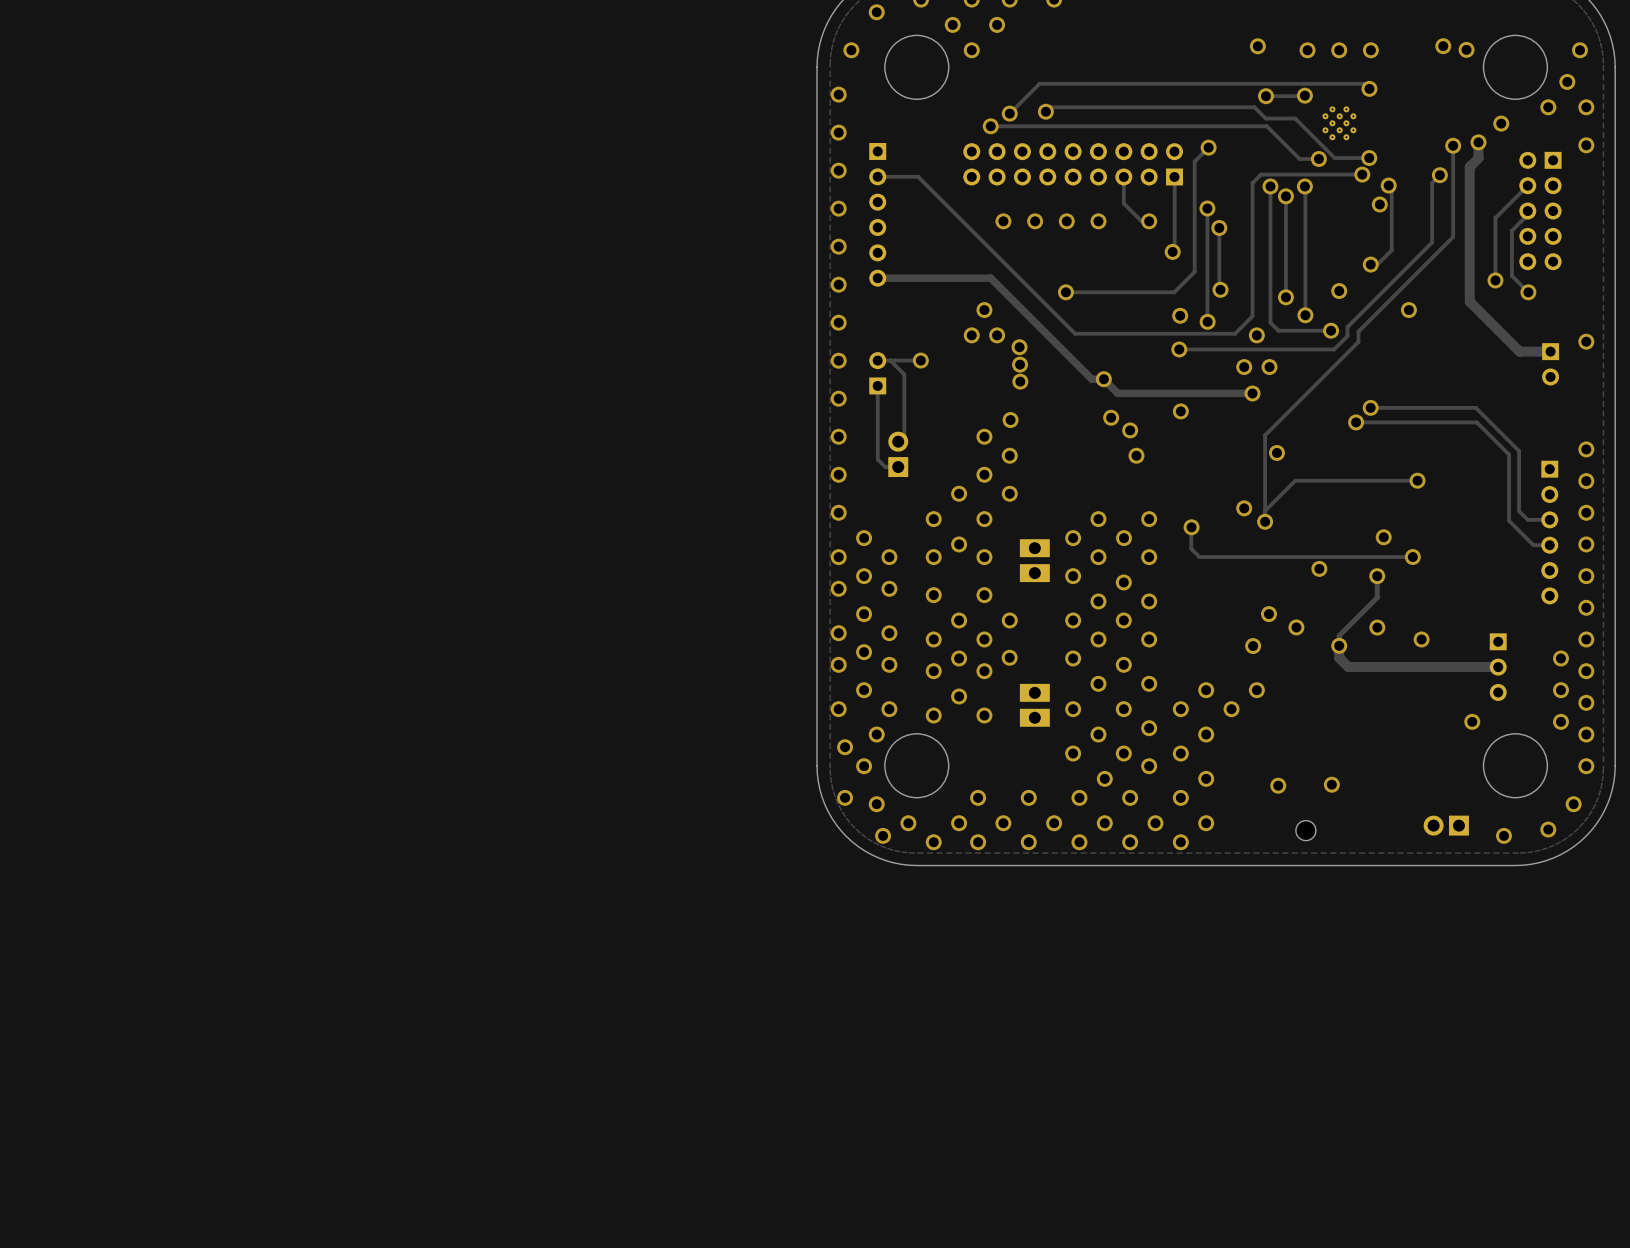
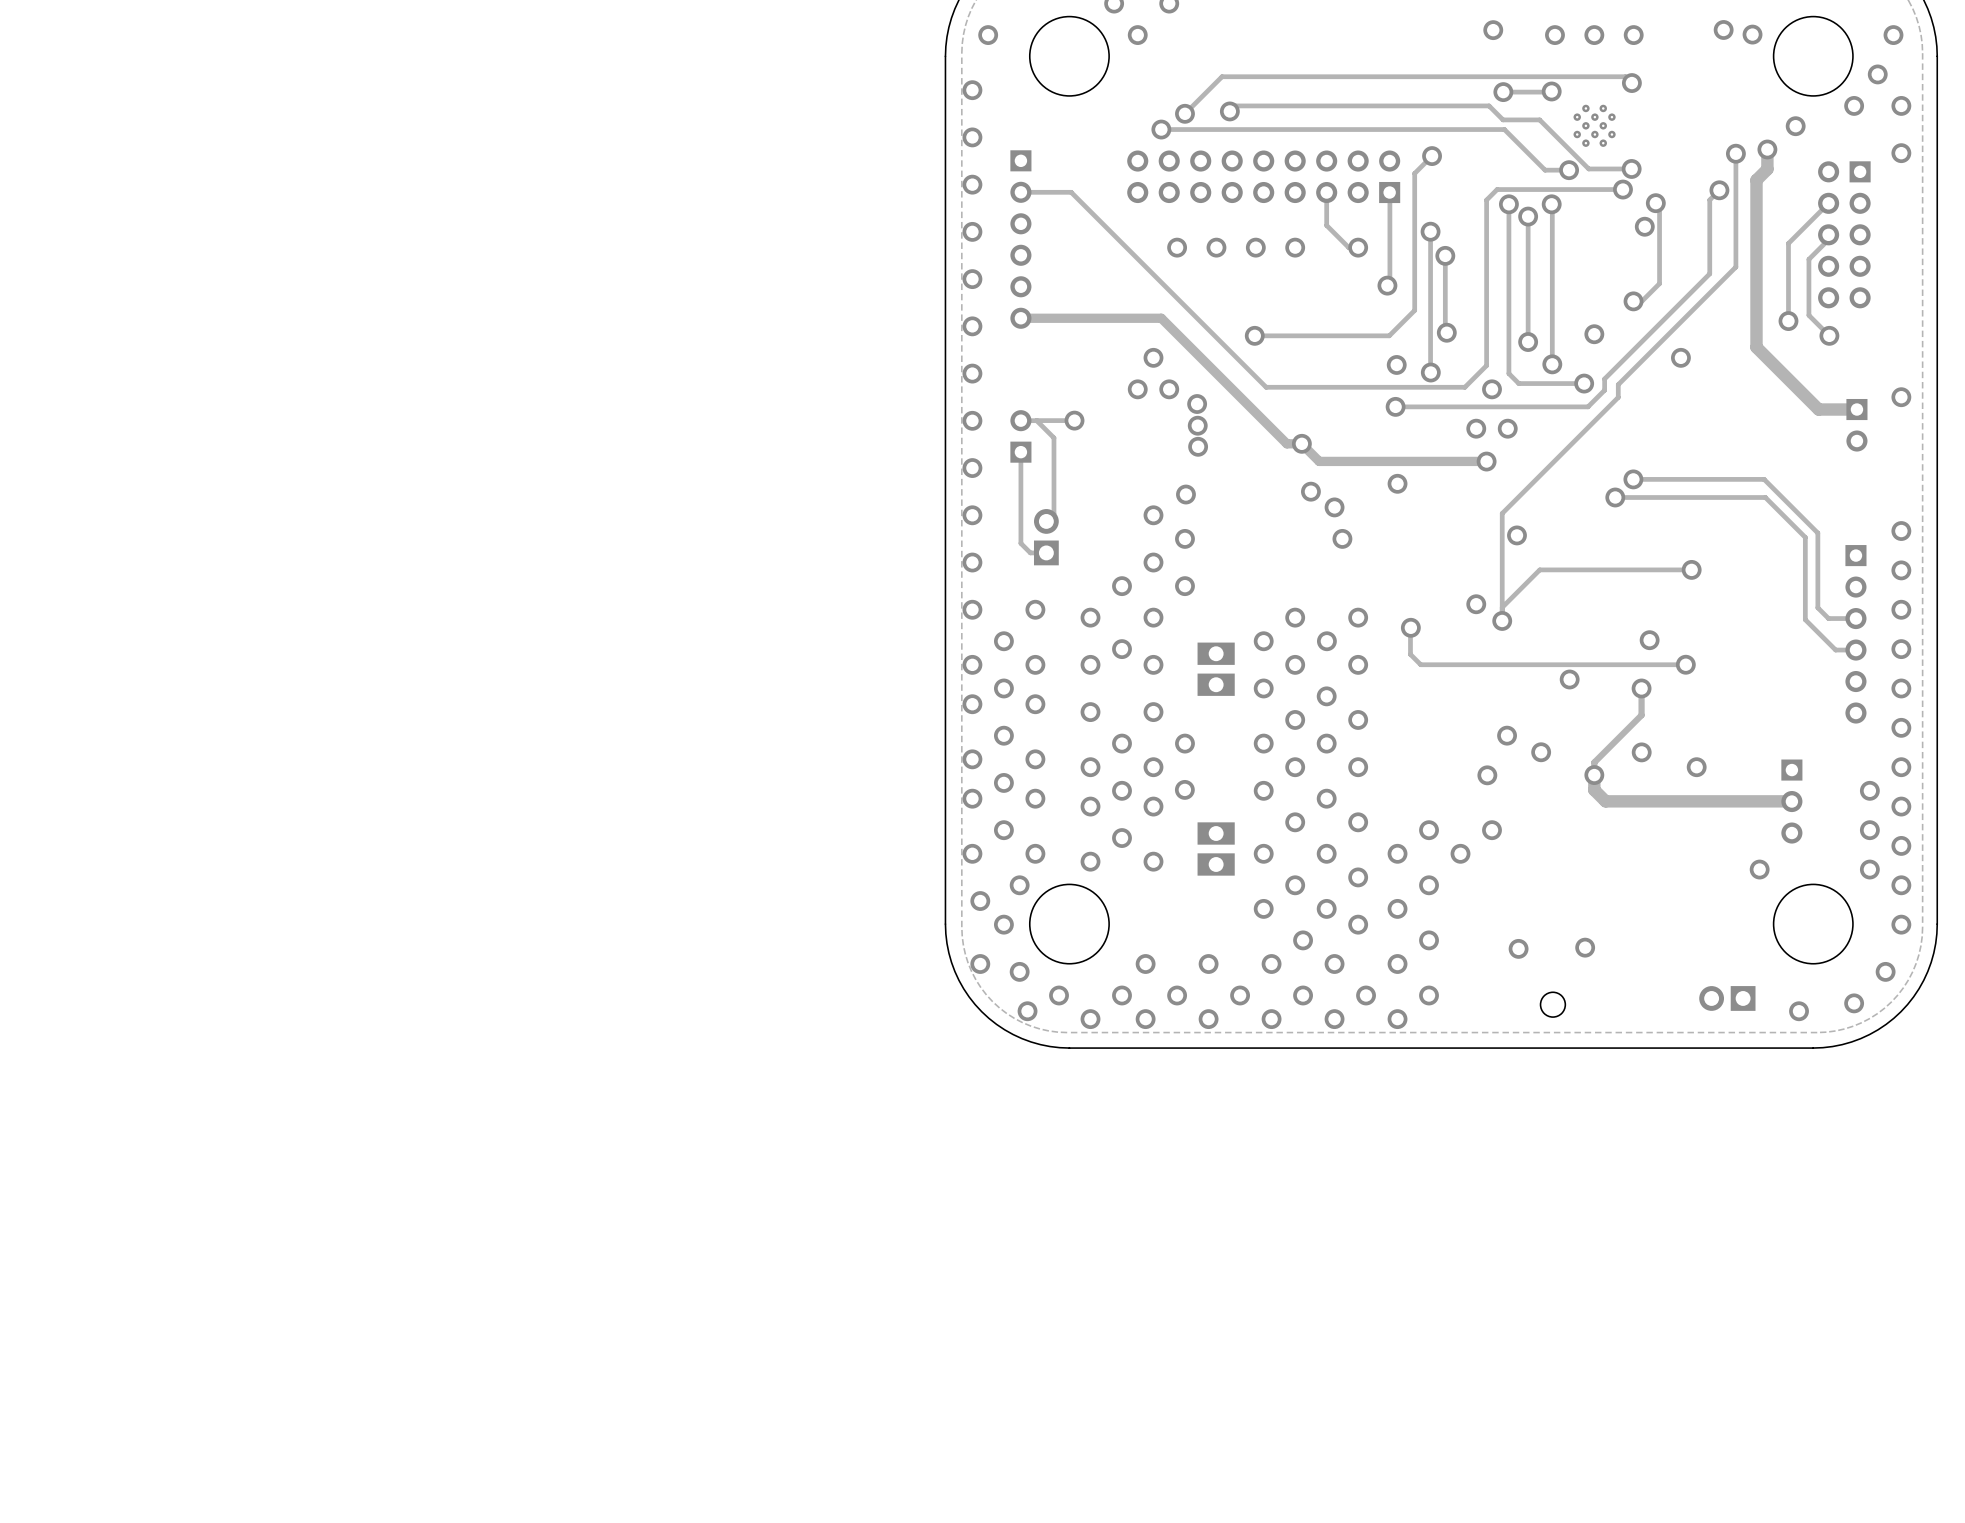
via: none -> (1035, 609)

